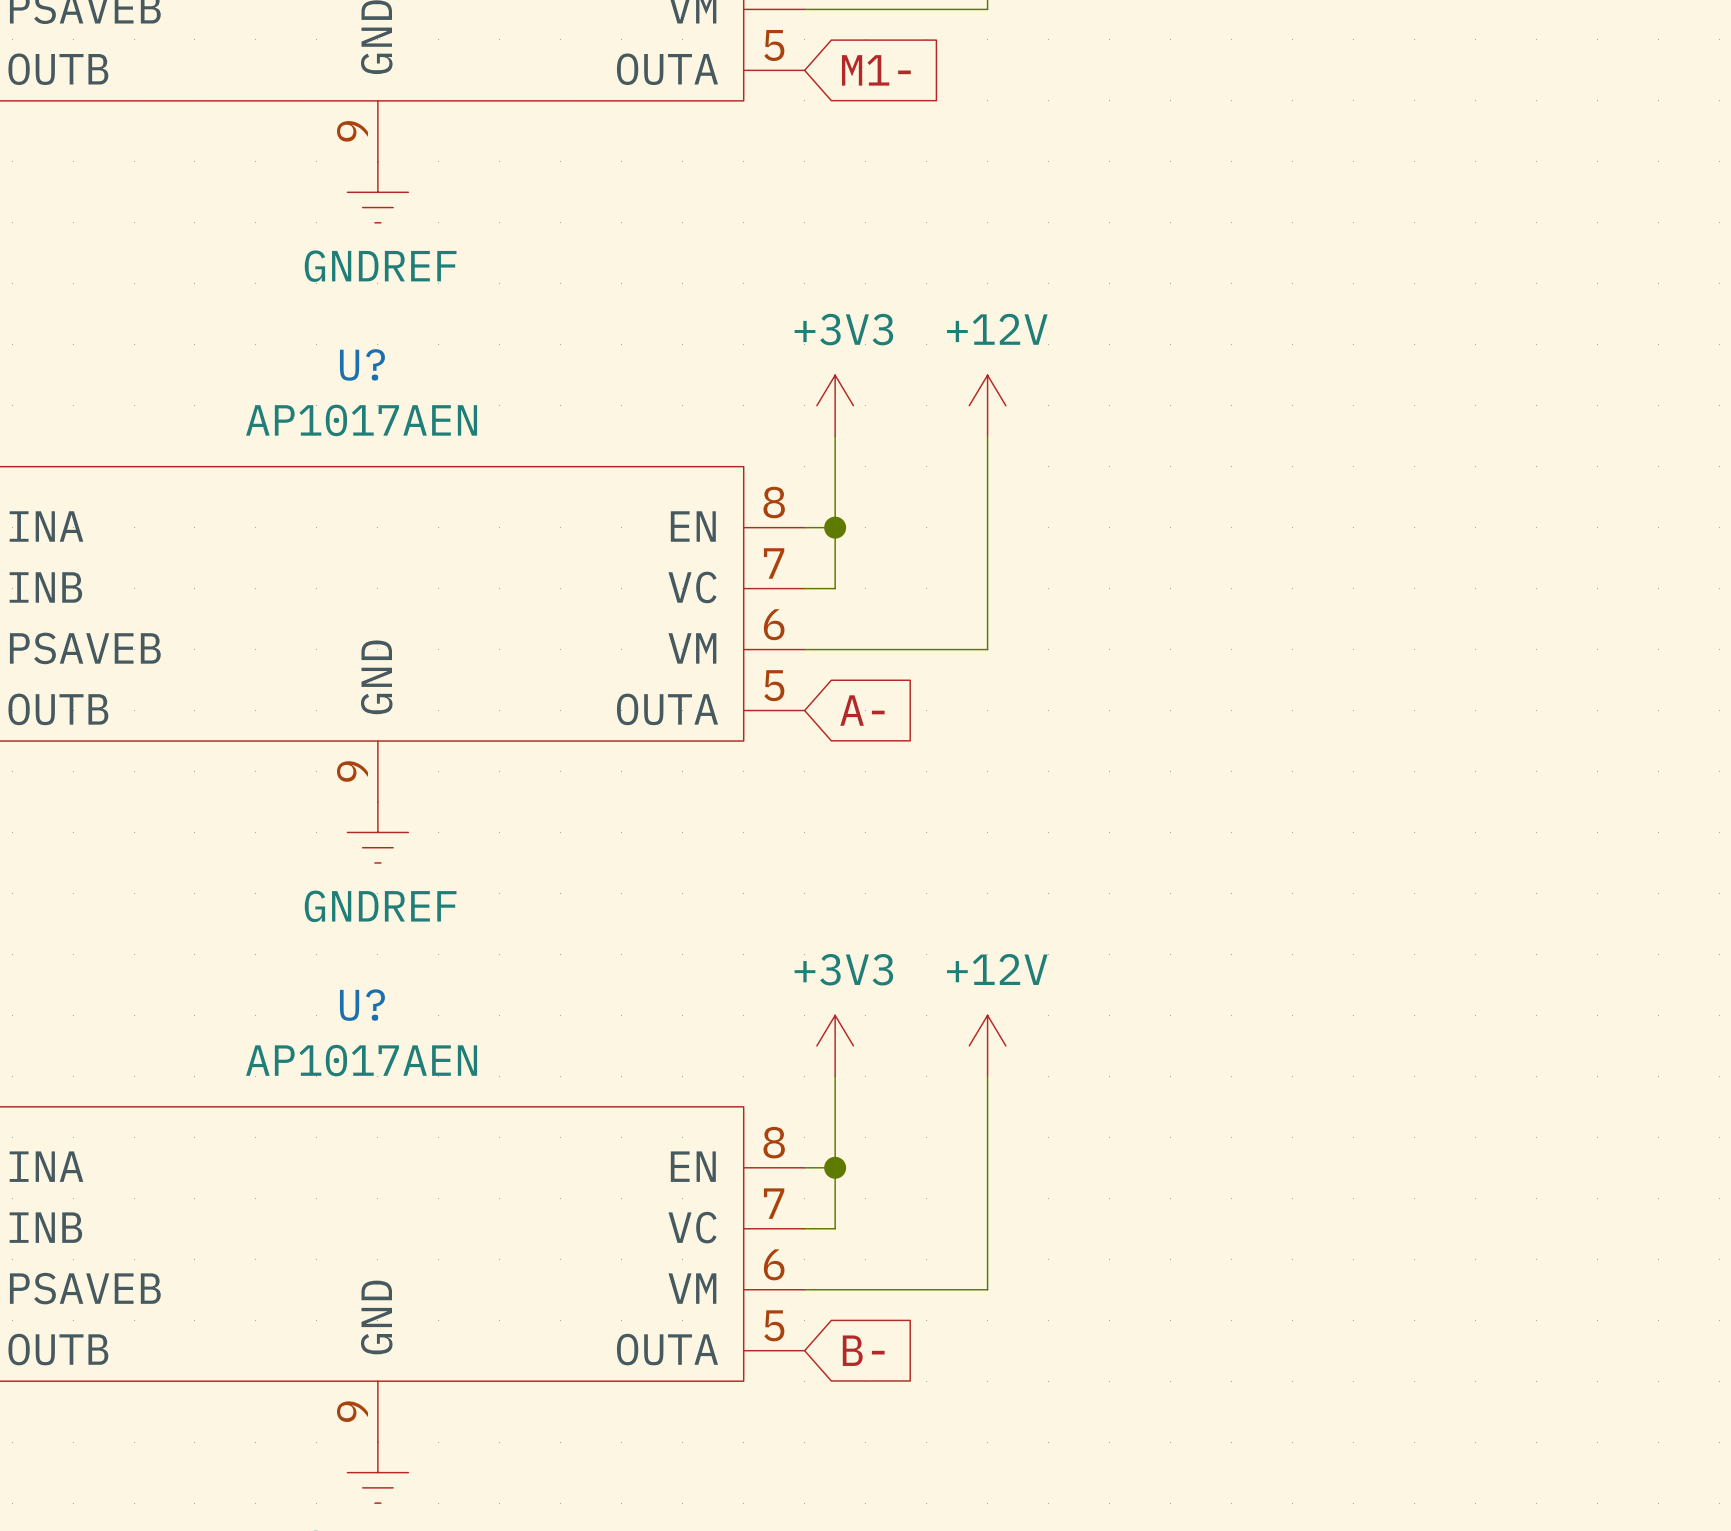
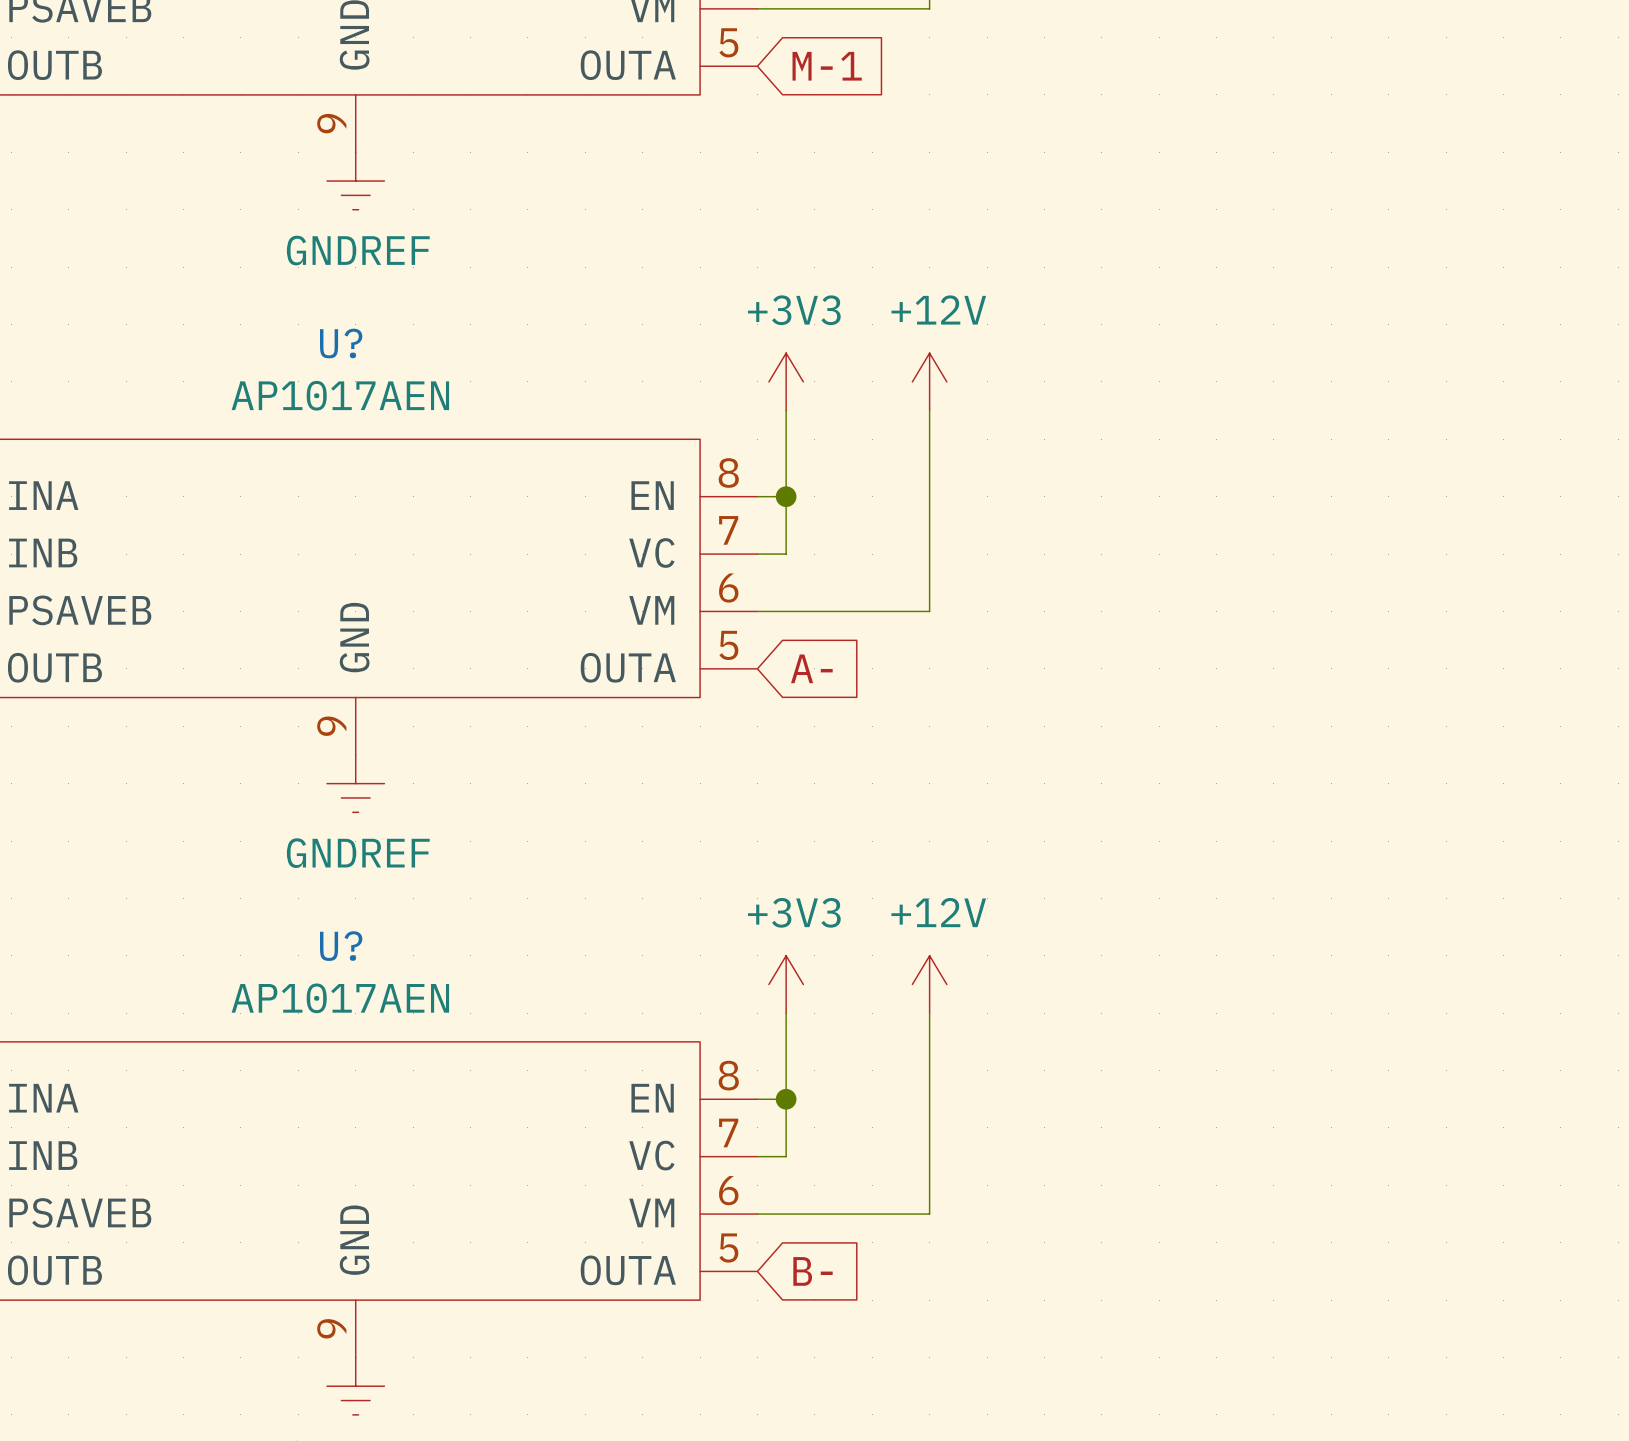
global label: M1- (876, 70) -> M-1 (827, 66)

